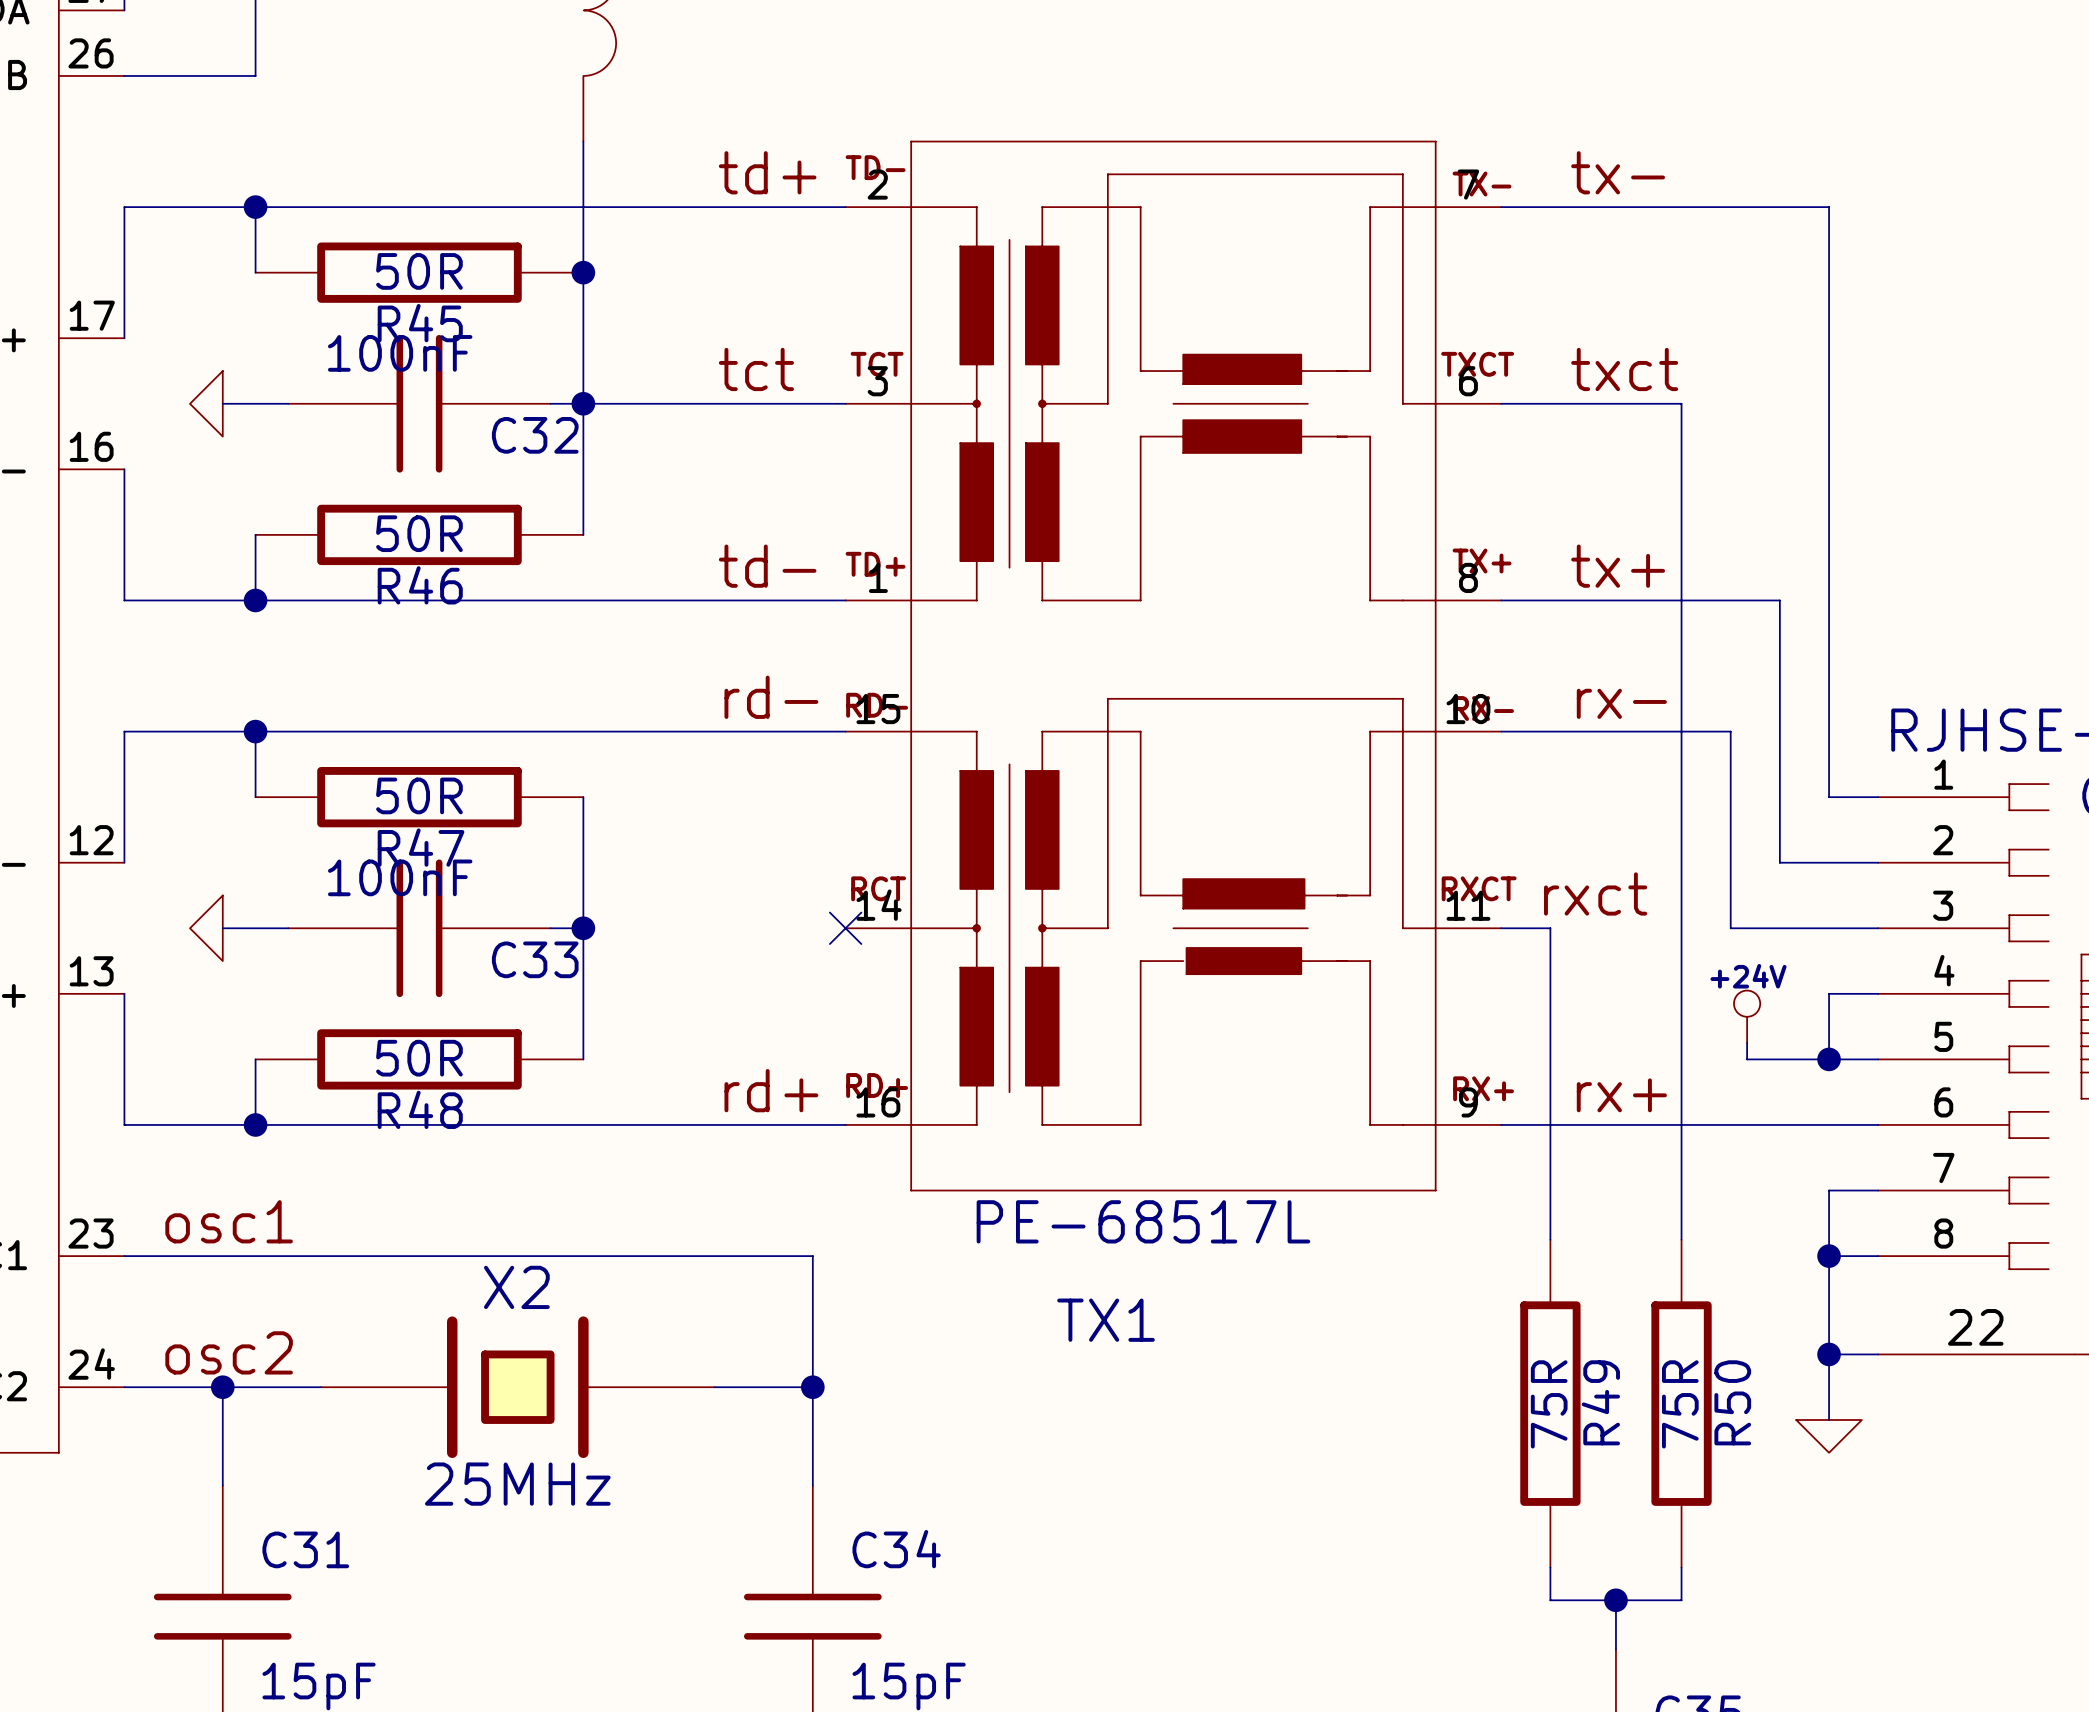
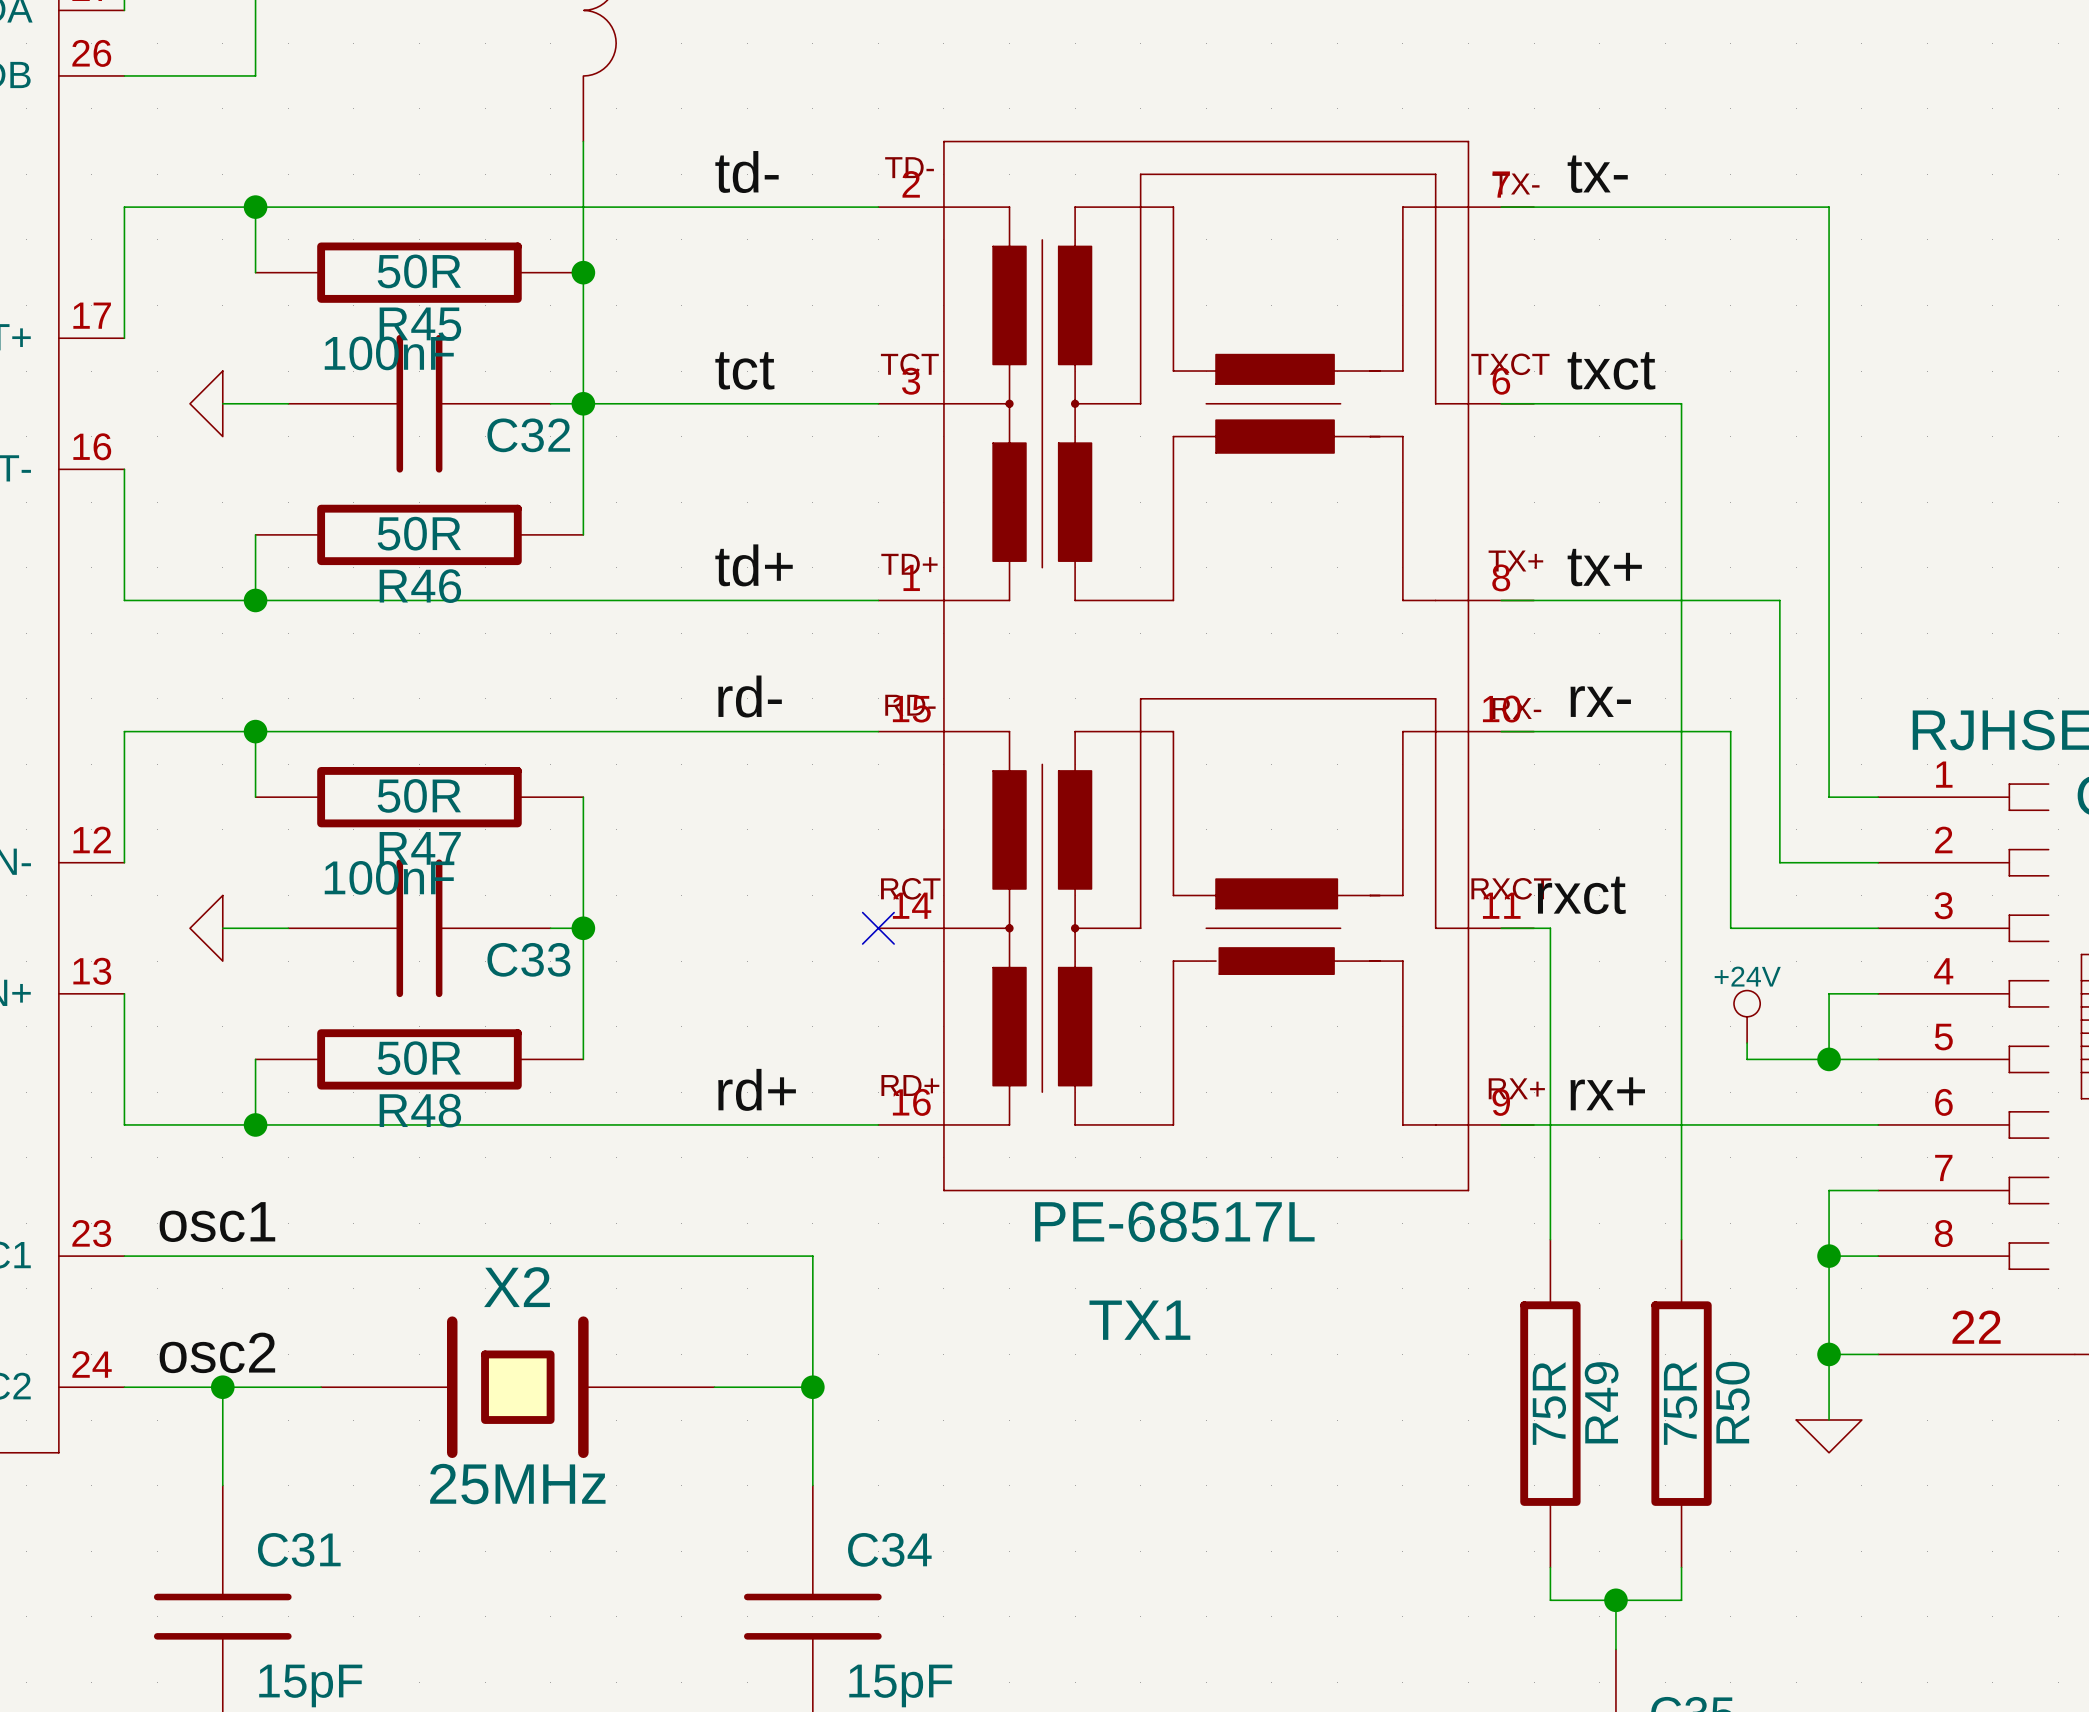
label: td+ (767, 172) -> td- (747, 172)
label: td- (767, 566) -> td+ (754, 565)
TX1 position: (1173, 666) -> (1206, 666)
no-connect mark position: (845, 928) -> (878, 928)

